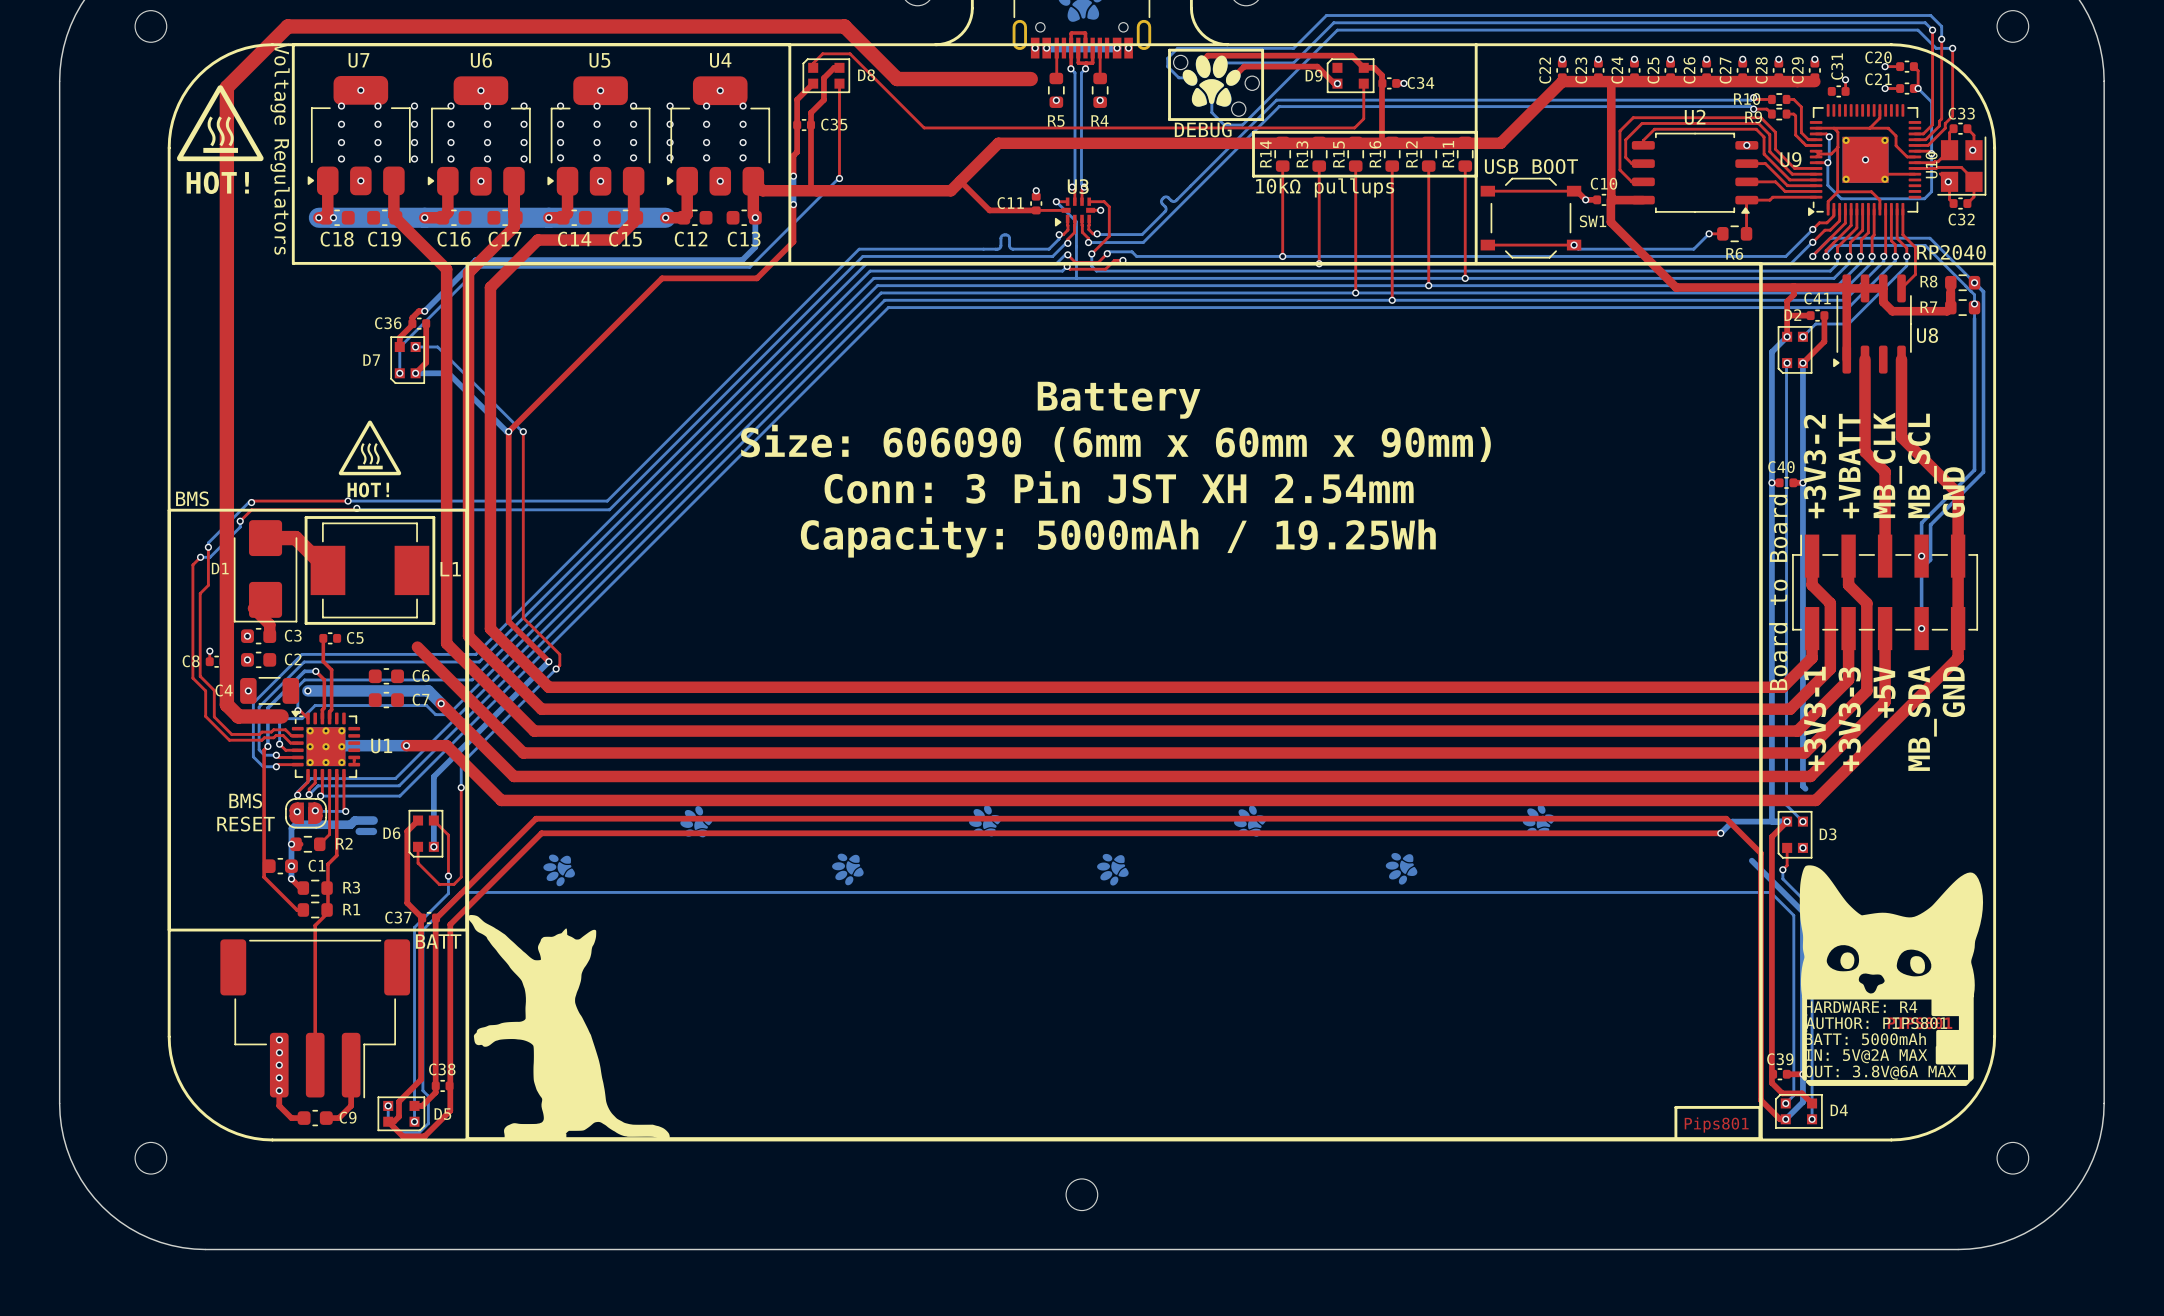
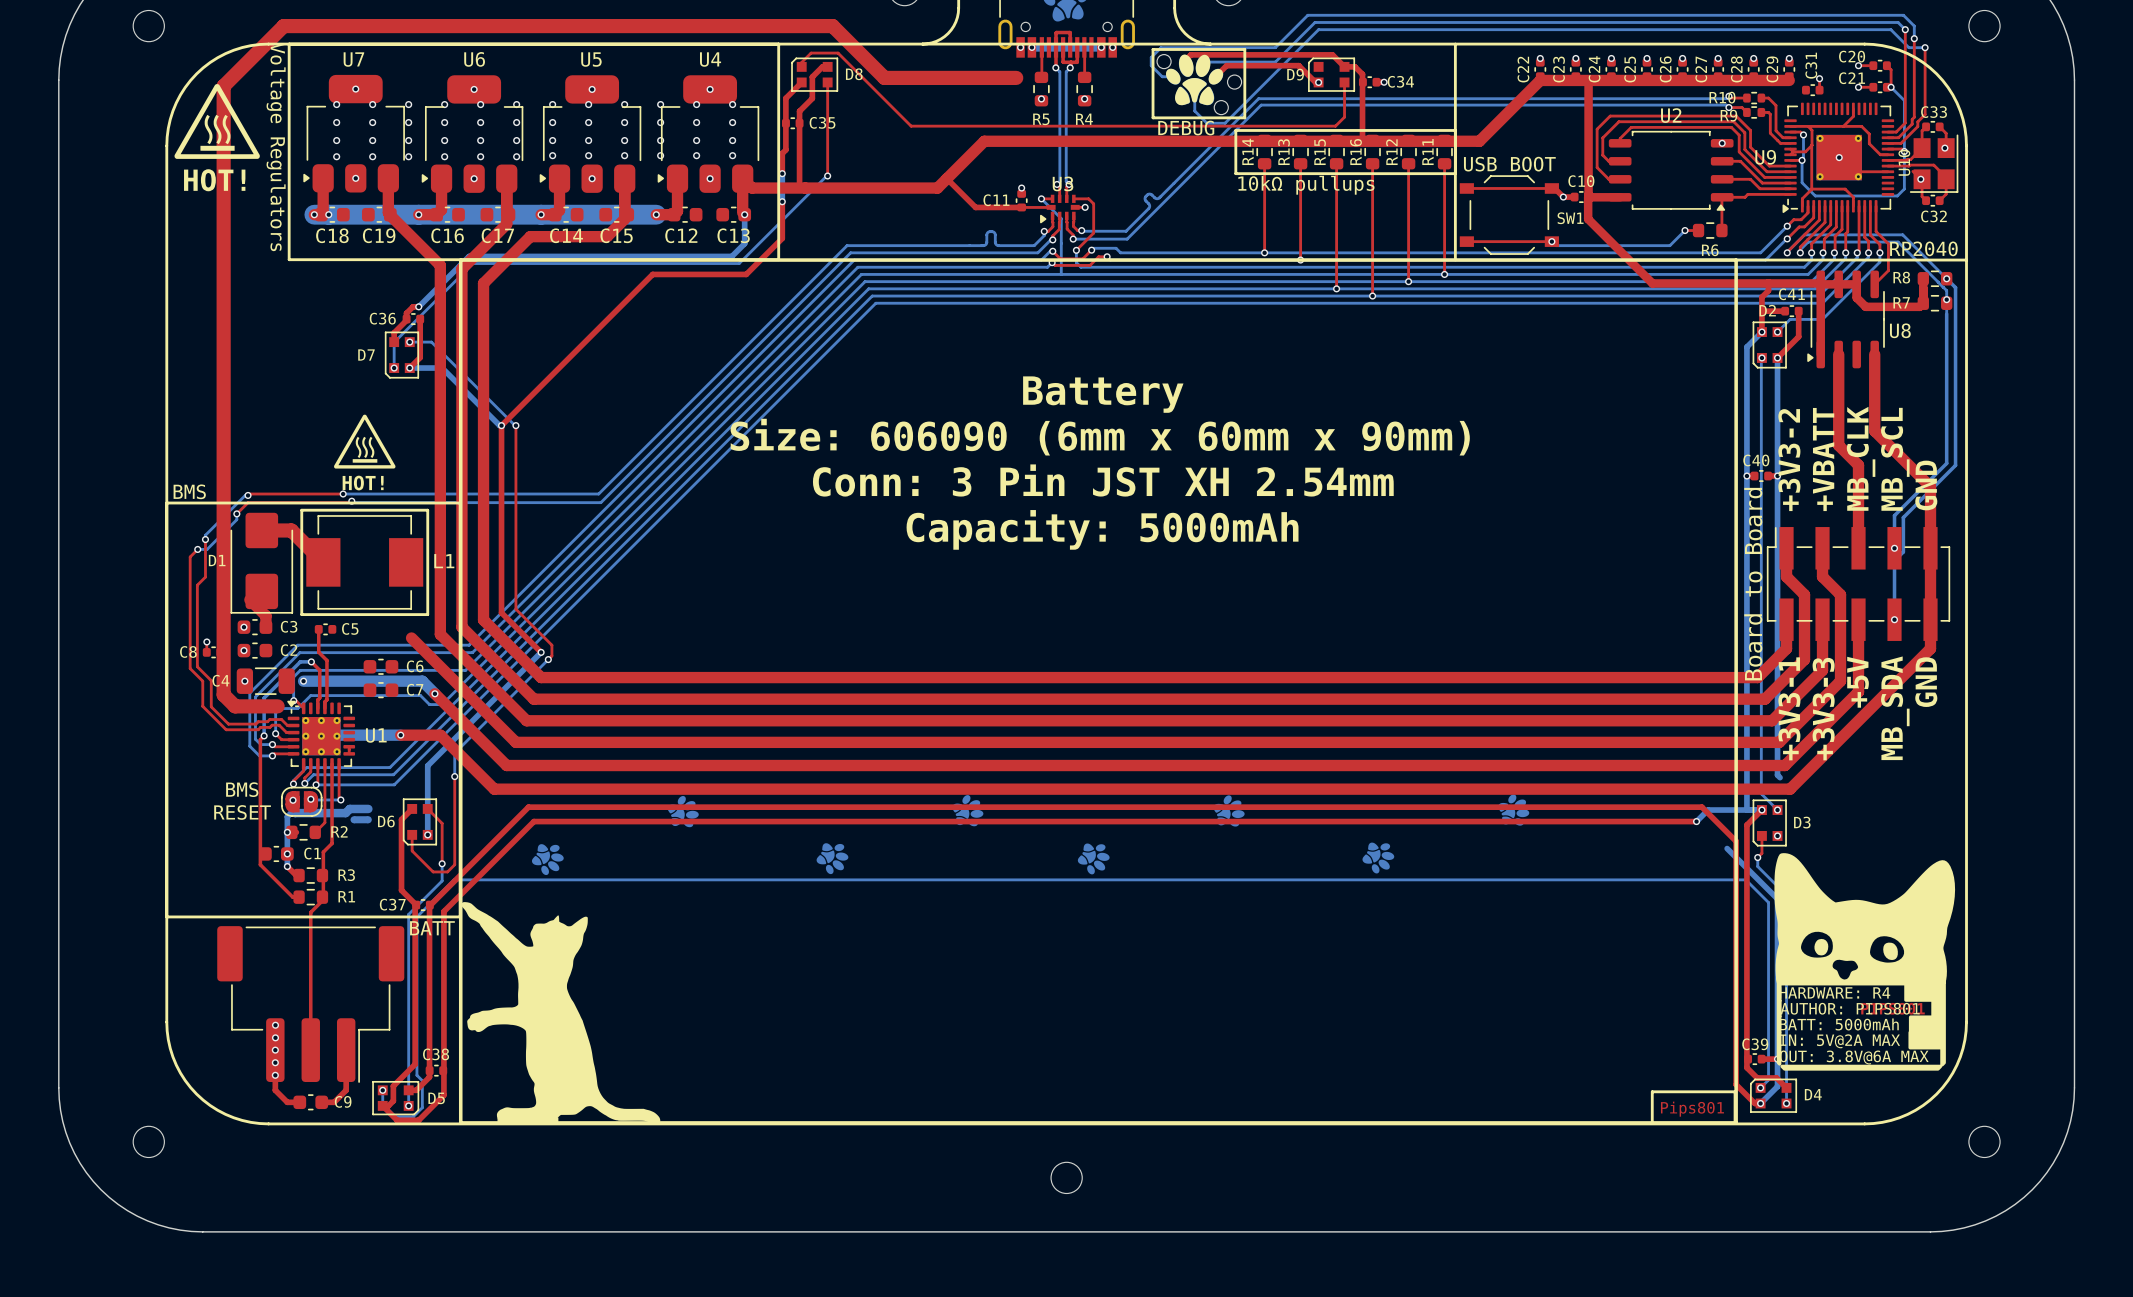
text: Capacity: 5000mAh / 19.25Wh (1118, 537) -> Capacity: 5000mAh (1102, 529)
drawing shape: [1522, 804, 1555, 836] -> [1498, 794, 1530, 826]
drawing shape: [969, 805, 1002, 837] -> [952, 795, 984, 827]
drawing shape: [1234, 805, 1267, 837] -> [1213, 795, 1245, 827]
drawing shape: [680, 806, 713, 838] -> [667, 796, 699, 828]
drawing shape: [1385, 852, 1418, 885] -> [1362, 842, 1395, 874]
drawing shape: [832, 853, 864, 886] -> [816, 843, 849, 875]
drawing shape: [1097, 853, 1129, 886] -> [1077, 843, 1110, 875]
drawing shape: [543, 854, 575, 887] -> [531, 844, 564, 876]

